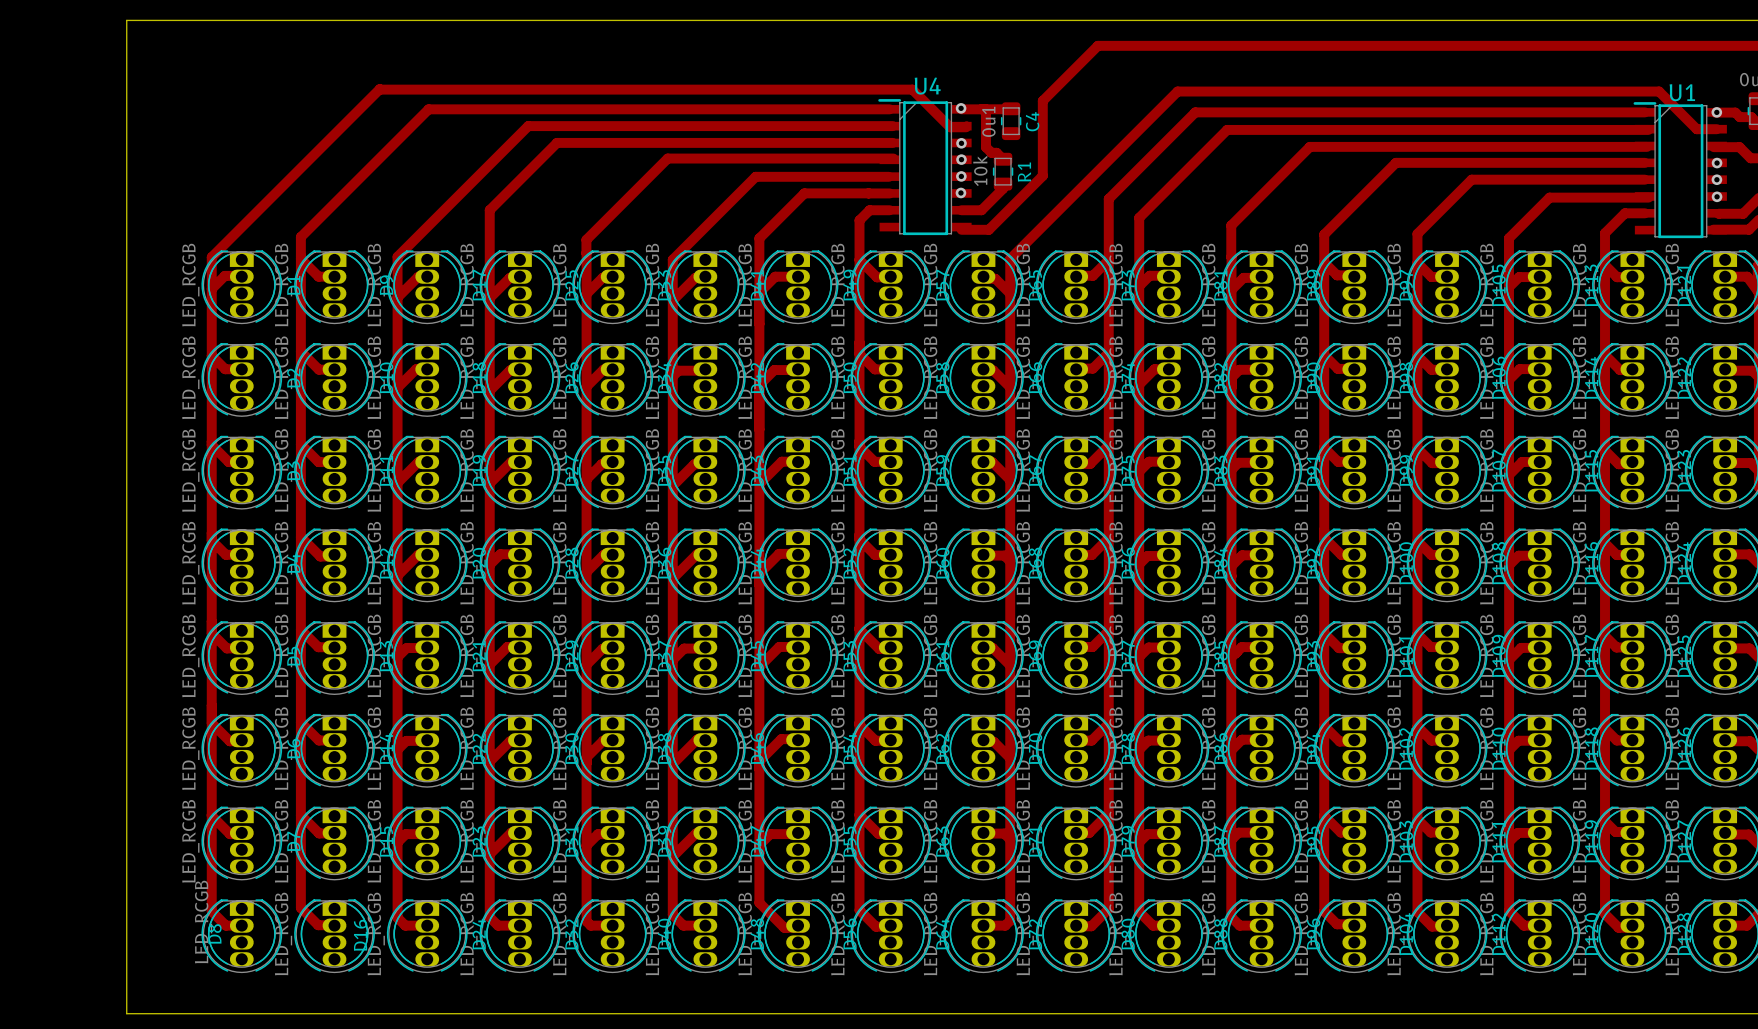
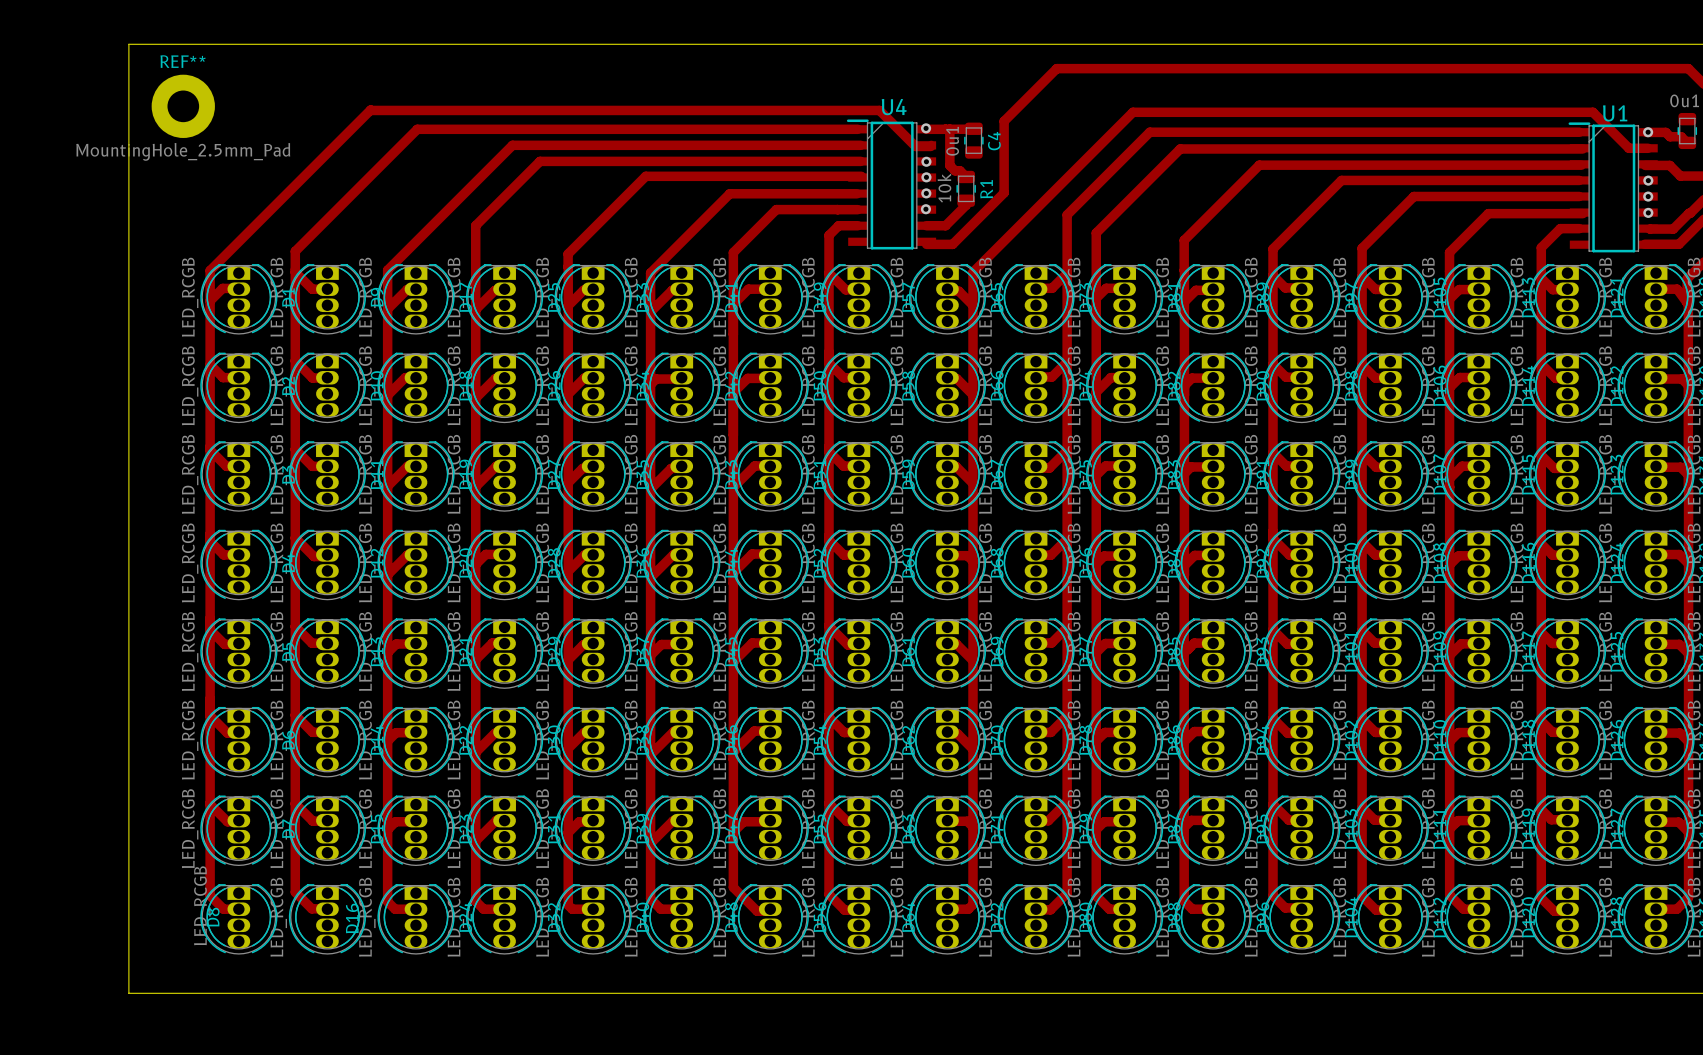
REF**: none -> MountingHole_2.5mm_Pad (183, 106)

